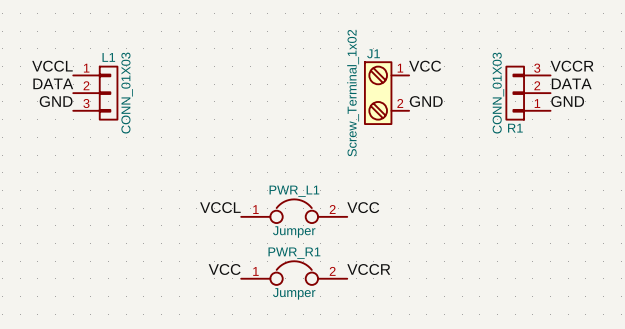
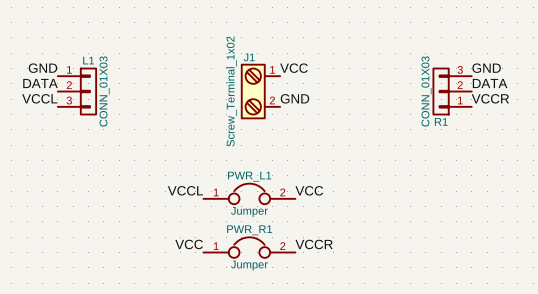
label: VCCL (52, 66) -> GND (42, 68)
label position: VCC (425, 66) -> VCC (293, 68)
label: VCCR (572, 66) -> GND (486, 68)
J1 position: (386, 93) -> (260, 91)
label: GND (56, 101) -> VCCL (39, 98)
label position: GND (426, 101) -> GND (294, 98)
label: GND (567, 101) -> VCCR (490, 98)

